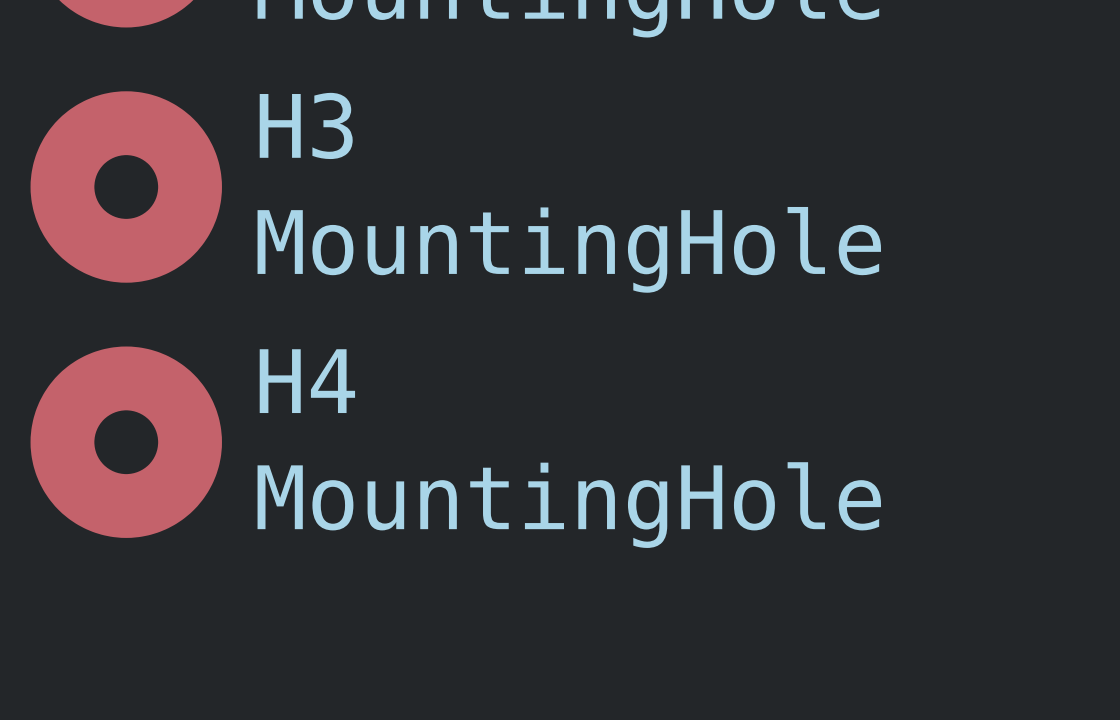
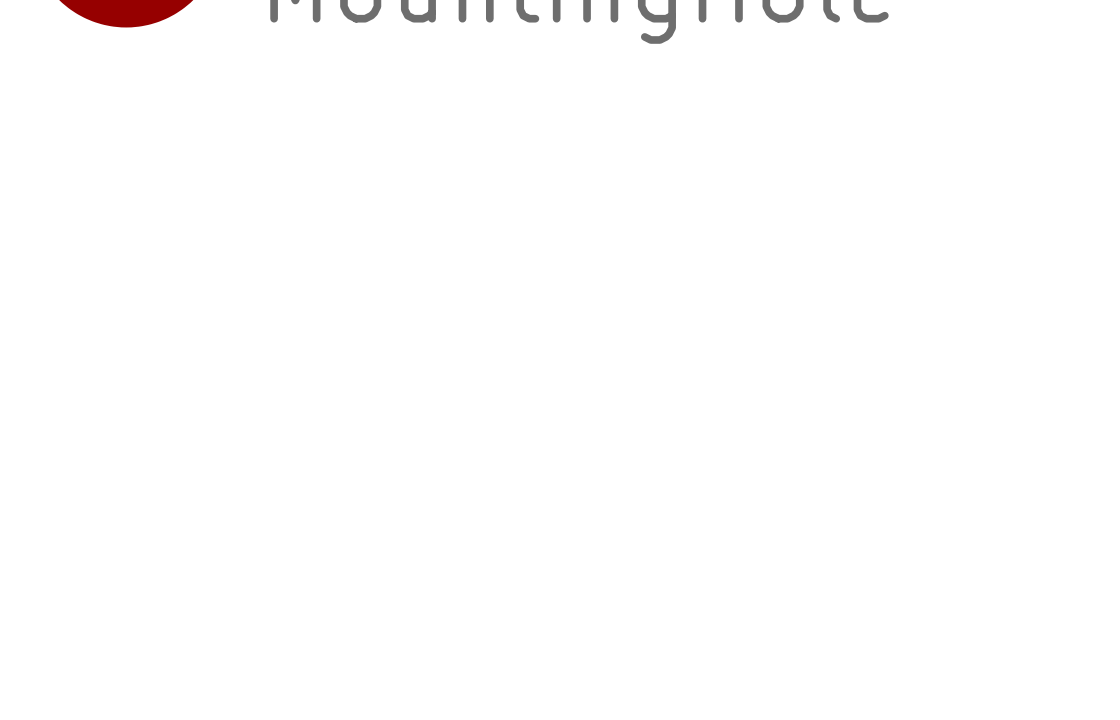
H3: MountingHole (126, 186) -> none
H4: MountingHole (126, 442) -> none

